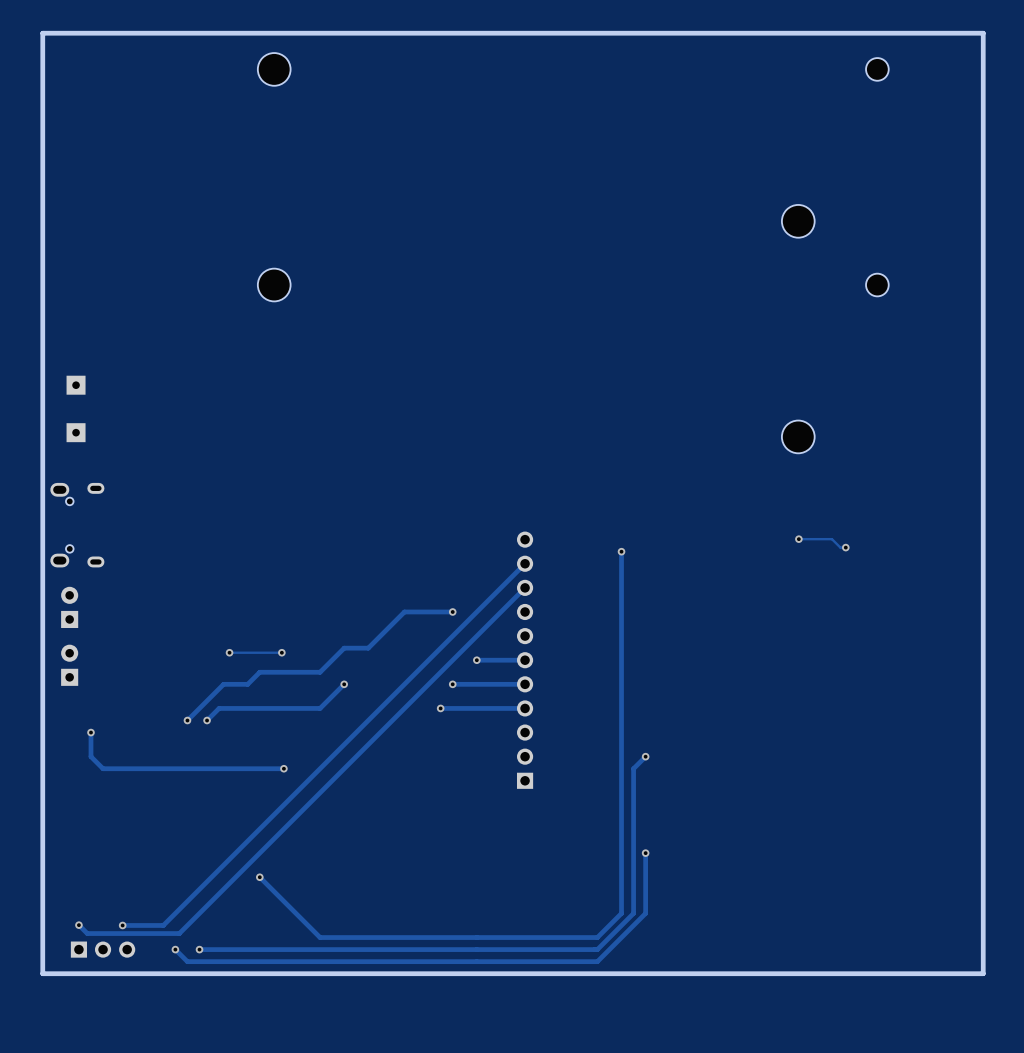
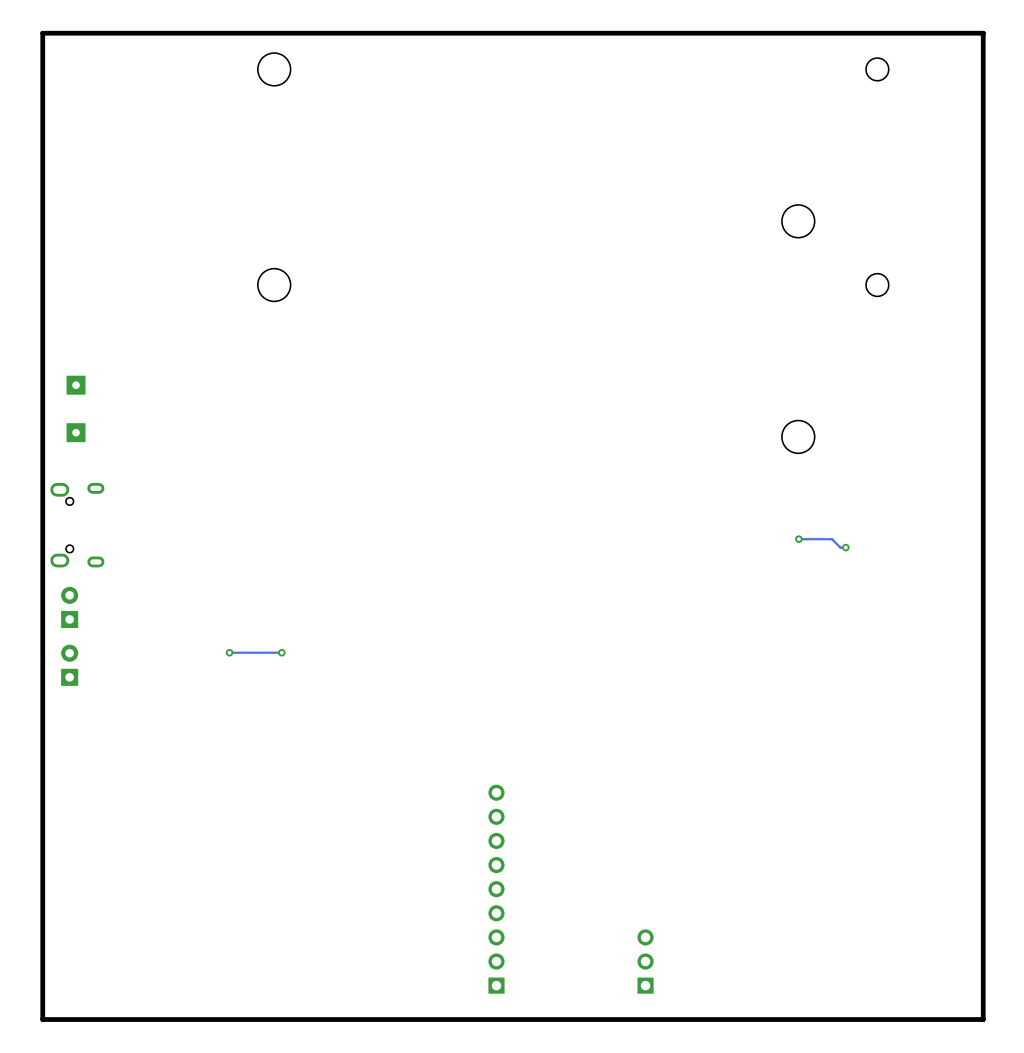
track: (621, 551) (621, 913) (597, 937) (320, 937) (259, 877) -> none
via: (621, 551) -> none
track: (525, 563) (163, 925) (122, 925) -> none
track: (525, 587) (179, 933) (87, 933) (78, 925) -> none
track: (452, 611) (404, 611) (368, 648) (344, 648) (320, 672) (259, 672) (247, 684) (223, 684) (187, 720) -> none
via: (452, 611) -> none
via: (476, 660) -> none
track: (525, 660) (476, 660) -> none
part: (525, 660) -> none
track: (344, 684) (320, 708) (219, 708) (207, 720) -> none
via: (344, 684) -> none
via: (452, 684) -> none
track: (525, 684) (452, 684) -> none
via: (440, 708) -> none
track: (525, 708) (440, 708) -> none
via: (187, 720) -> none
via: (207, 720) -> none
track: (90, 732) (90, 756) (103, 768) (283, 768) -> none
via: (90, 732) -> none
track: (645, 756) (633, 768) (633, 913) (597, 949) (199, 949) -> none
via: (645, 756) -> none
via: (283, 768) -> none
track: (645, 853) (645, 913) (597, 961) (187, 961) (175, 949) -> none
via: (645, 853) -> none
via: (259, 877) -> none
part: none -> (496, 889)
via: (78, 925) -> none
via: (122, 925) -> none
part: (103, 949) -> none
via: (175, 949) -> none
via: (199, 949) -> none
part: none -> (645, 961)
board edge: (983, 973) (42, 973) -> (983, 973) (983, 1019) (42, 1019) (42, 973)

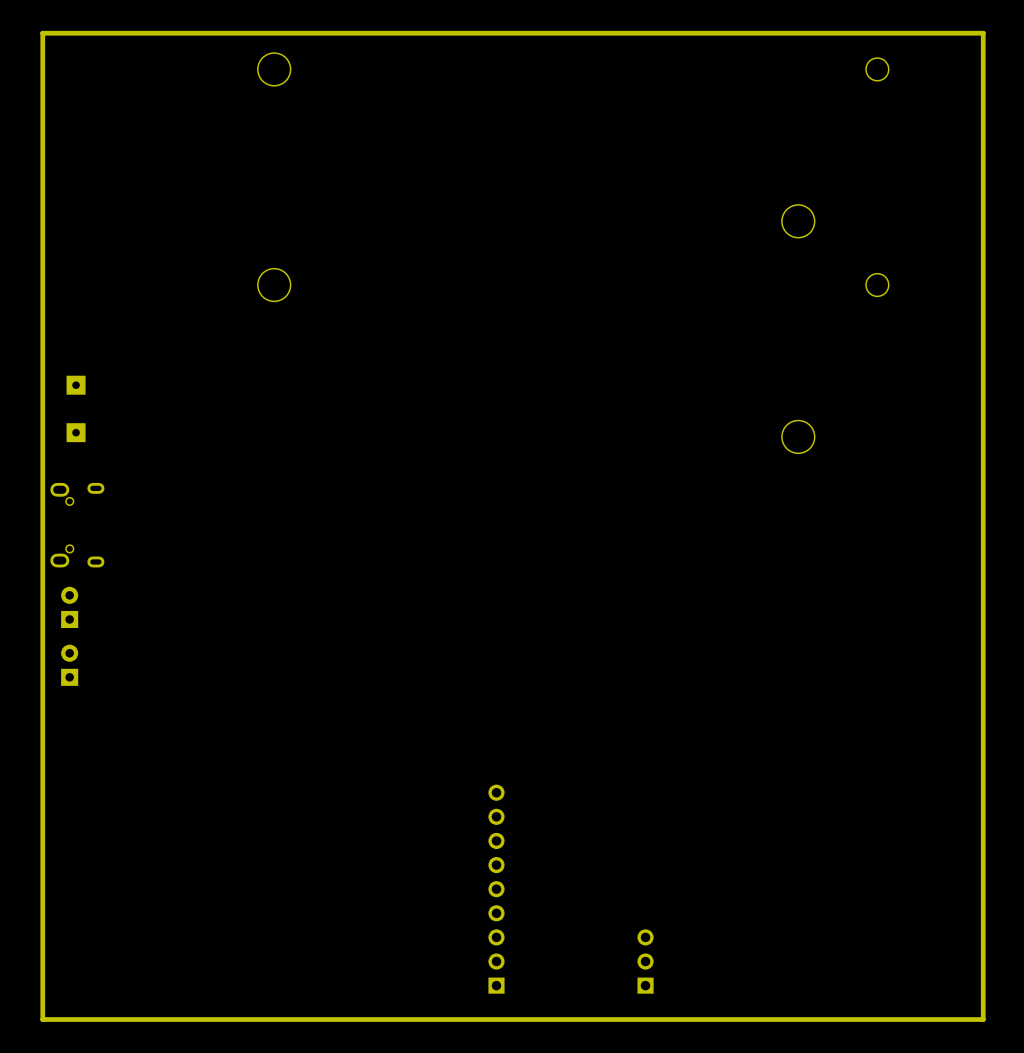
track: (798, 539) (831, 539) (840, 547) (845, 547) -> none
via: (798, 539) -> none
via: (845, 547) -> none
via: (229, 652) -> none
track: (281, 652) (229, 652) -> none
via: (281, 652) -> none

